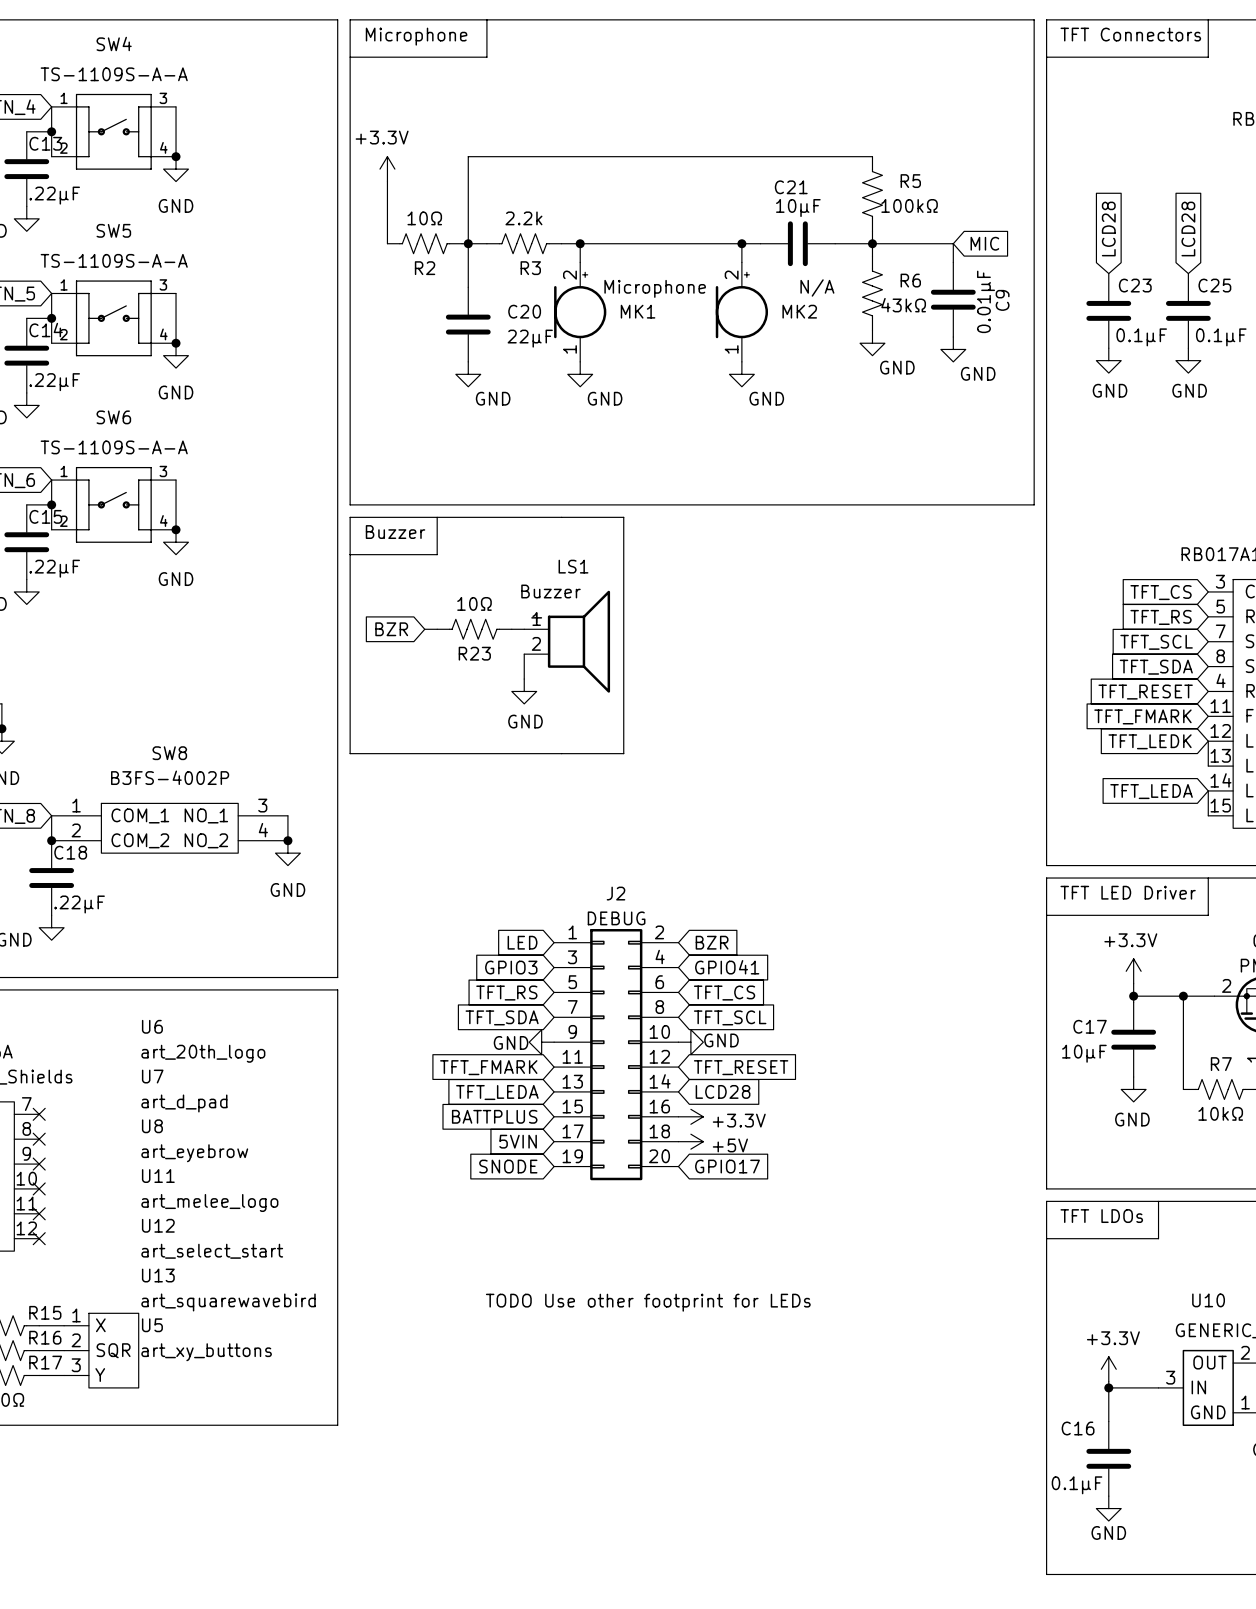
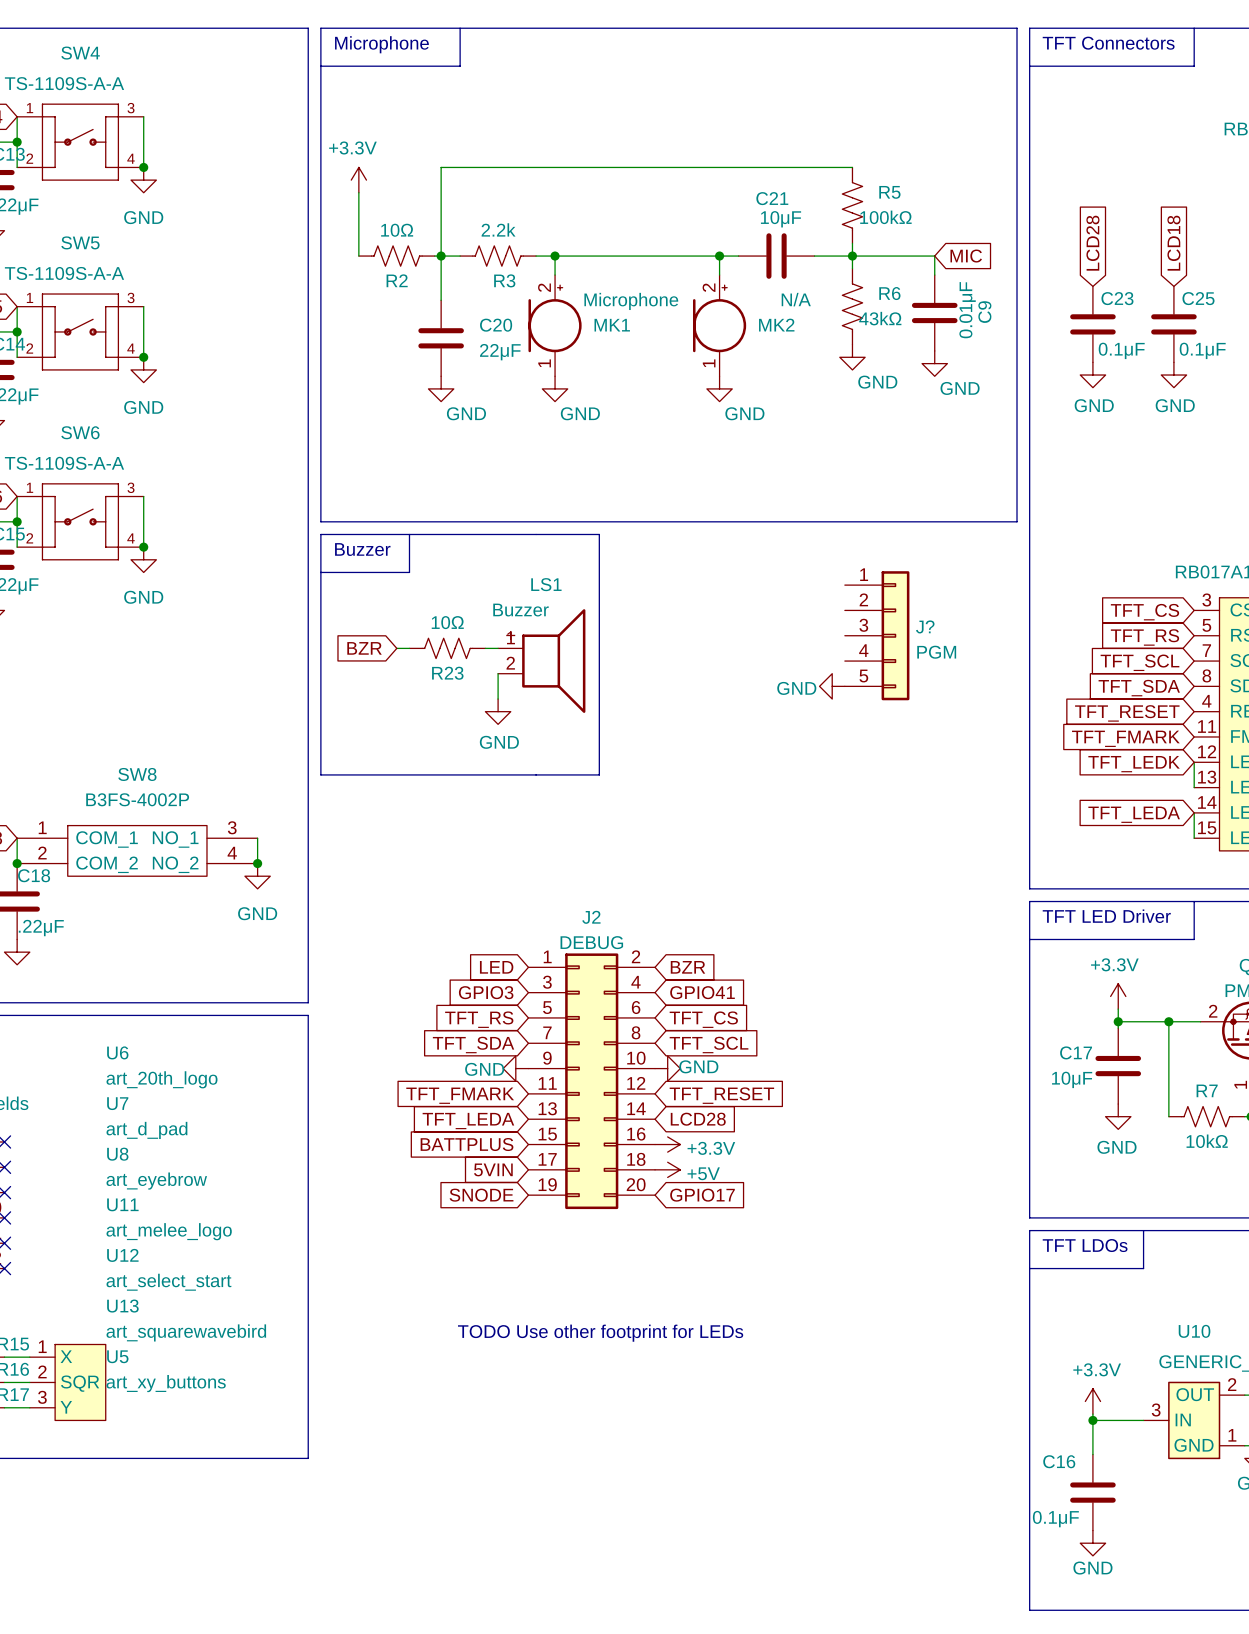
global label: LCD28 (1188, 229) -> LCD18 (1173, 243)
J?: none -> PGM (877, 635)
power symbol: none -> GND (832, 686)

